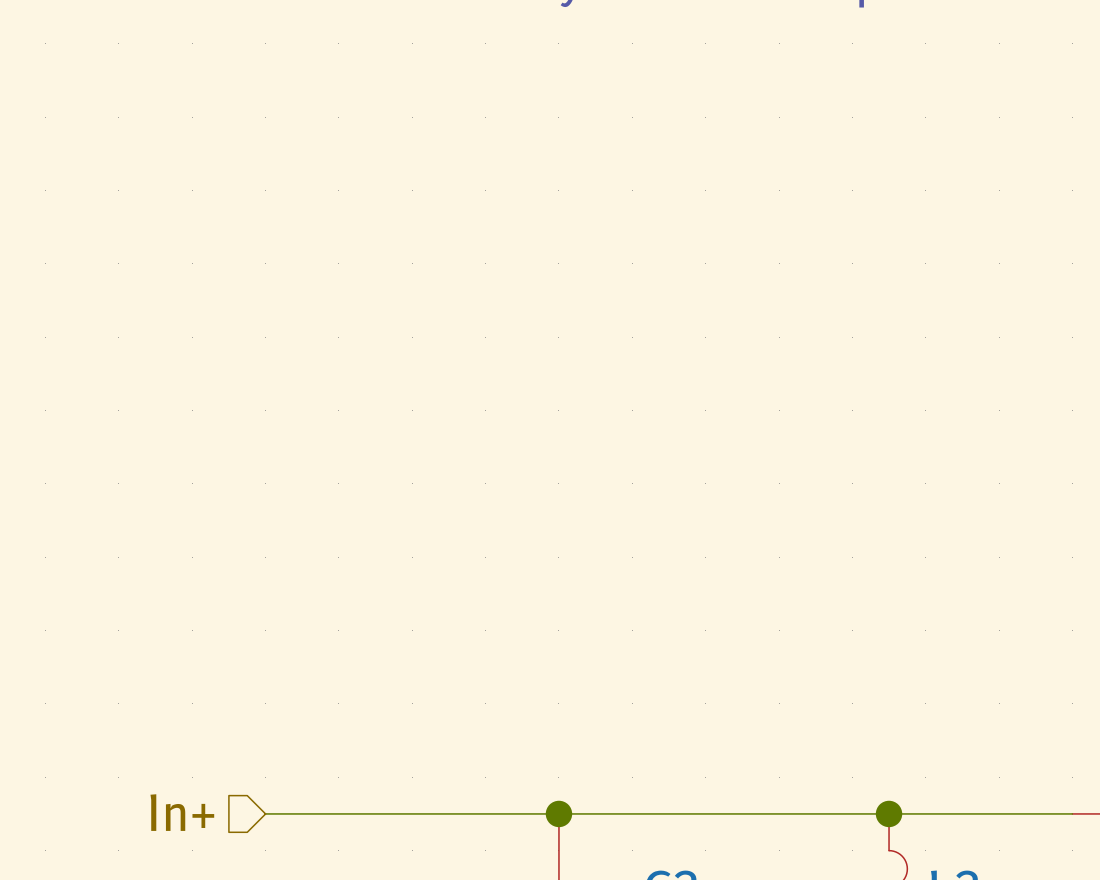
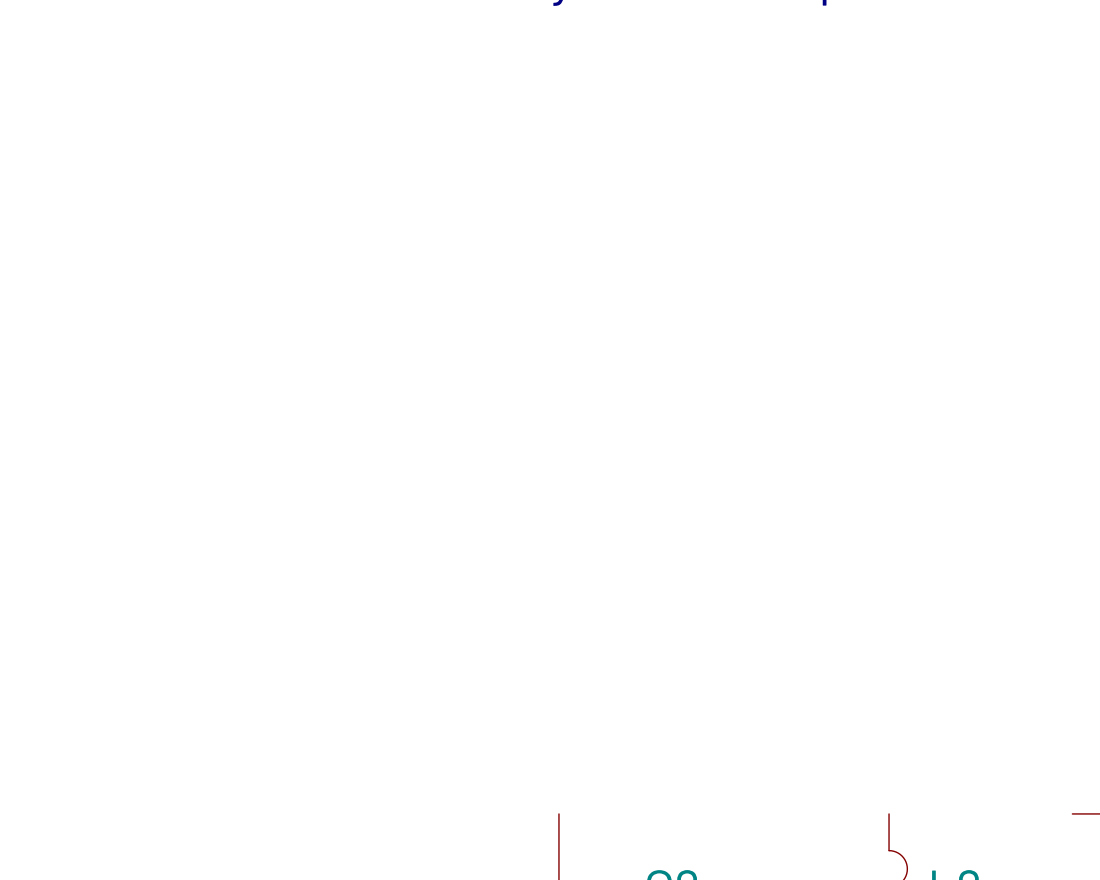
hierarchical label: In+ (182, 812) -> none
wire: (265, 813) (1072, 813) -> none
junction: (558, 813) -> none
junction: (889, 813) -> none

